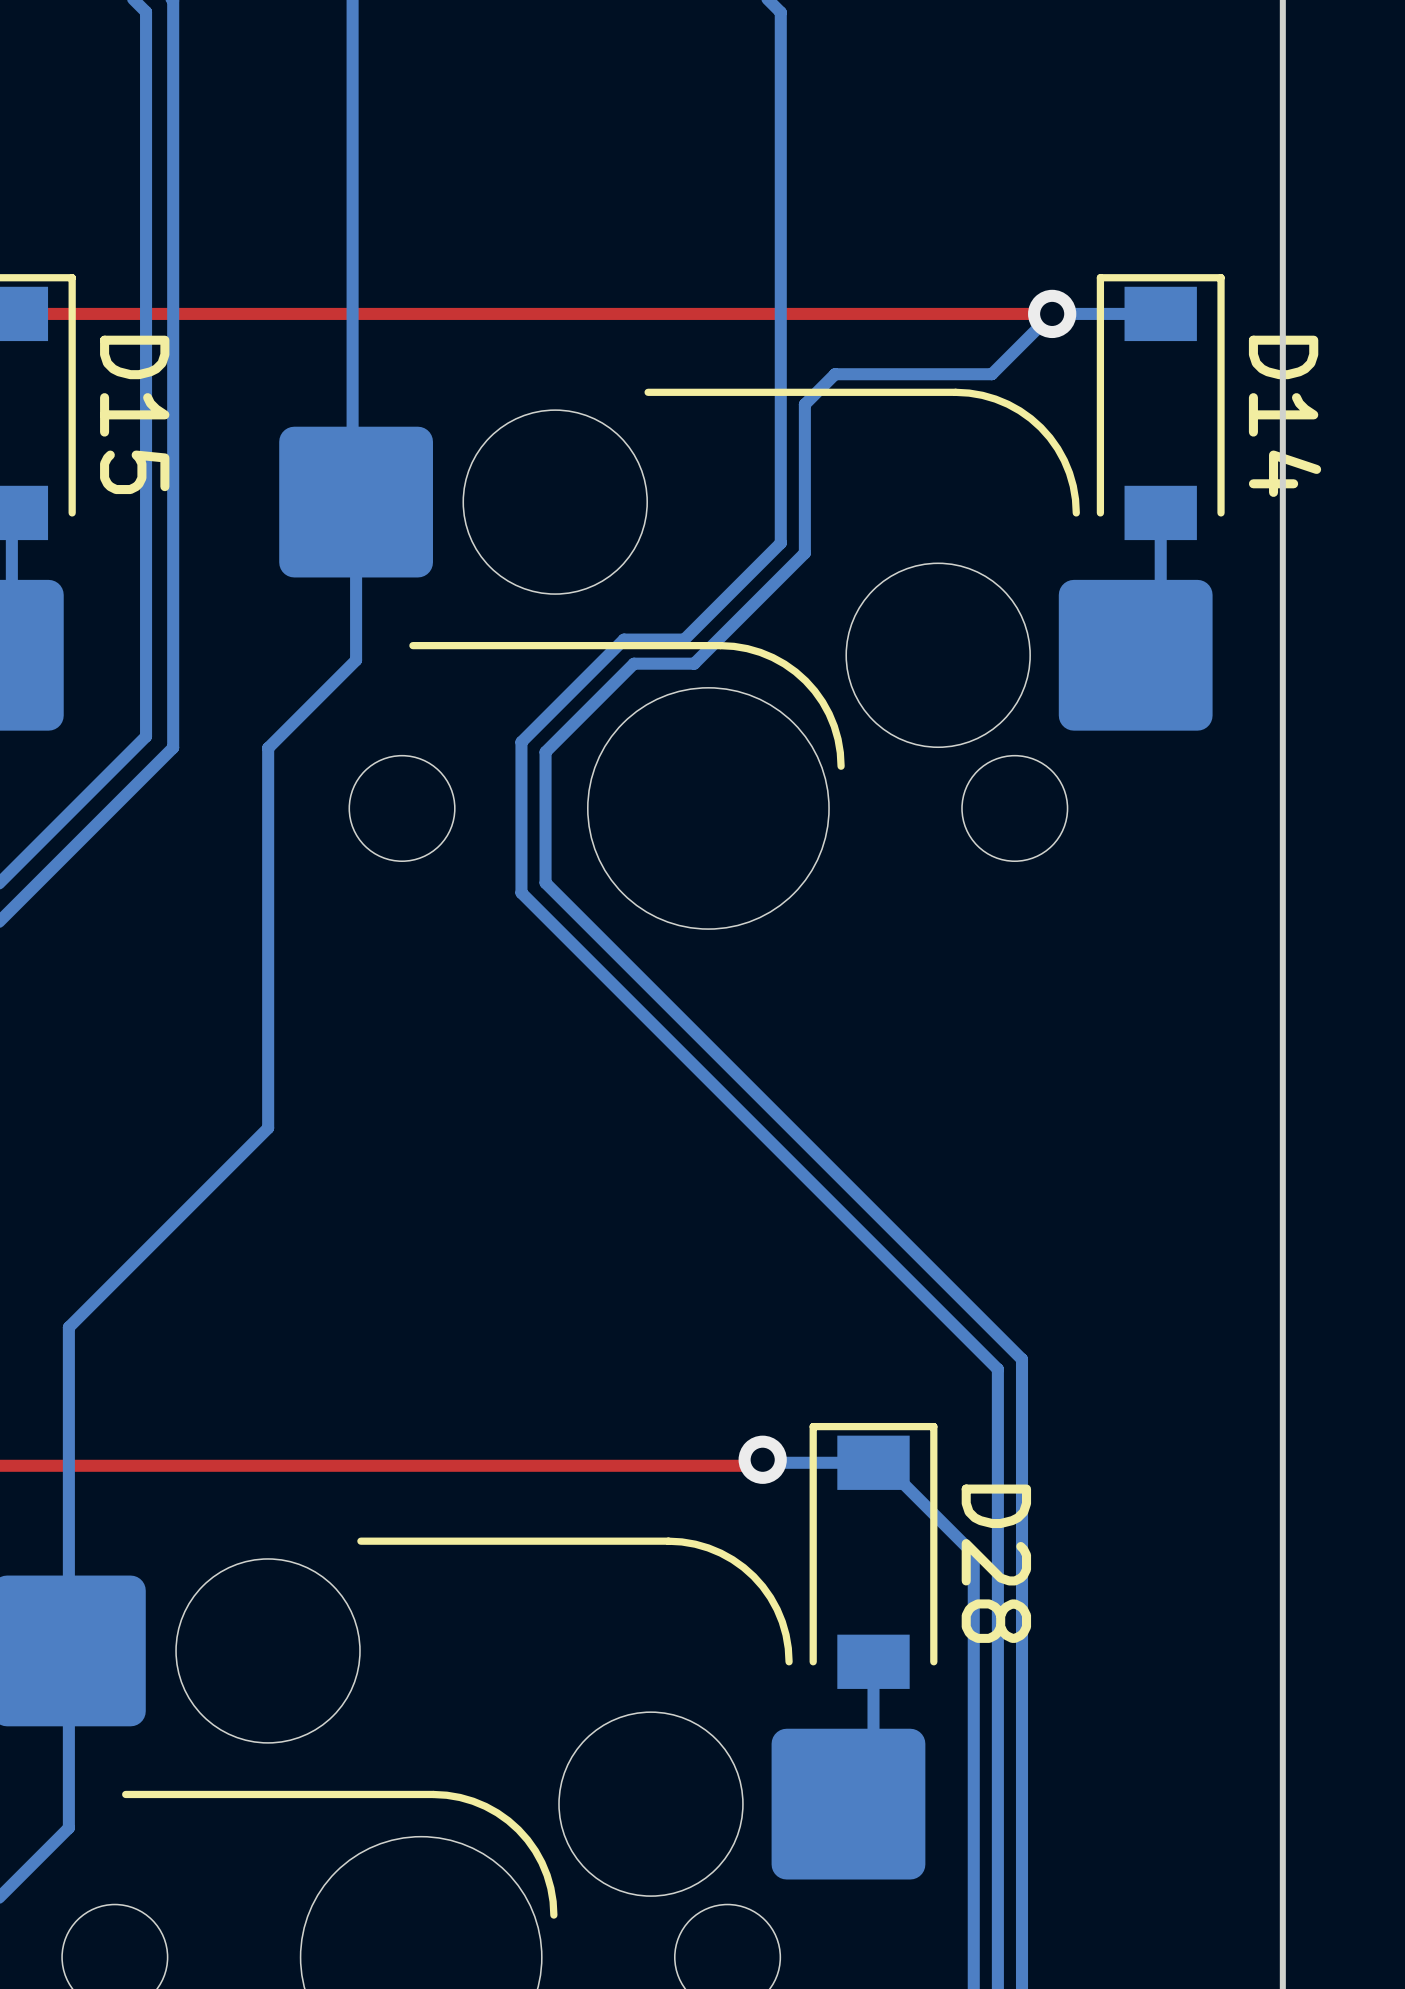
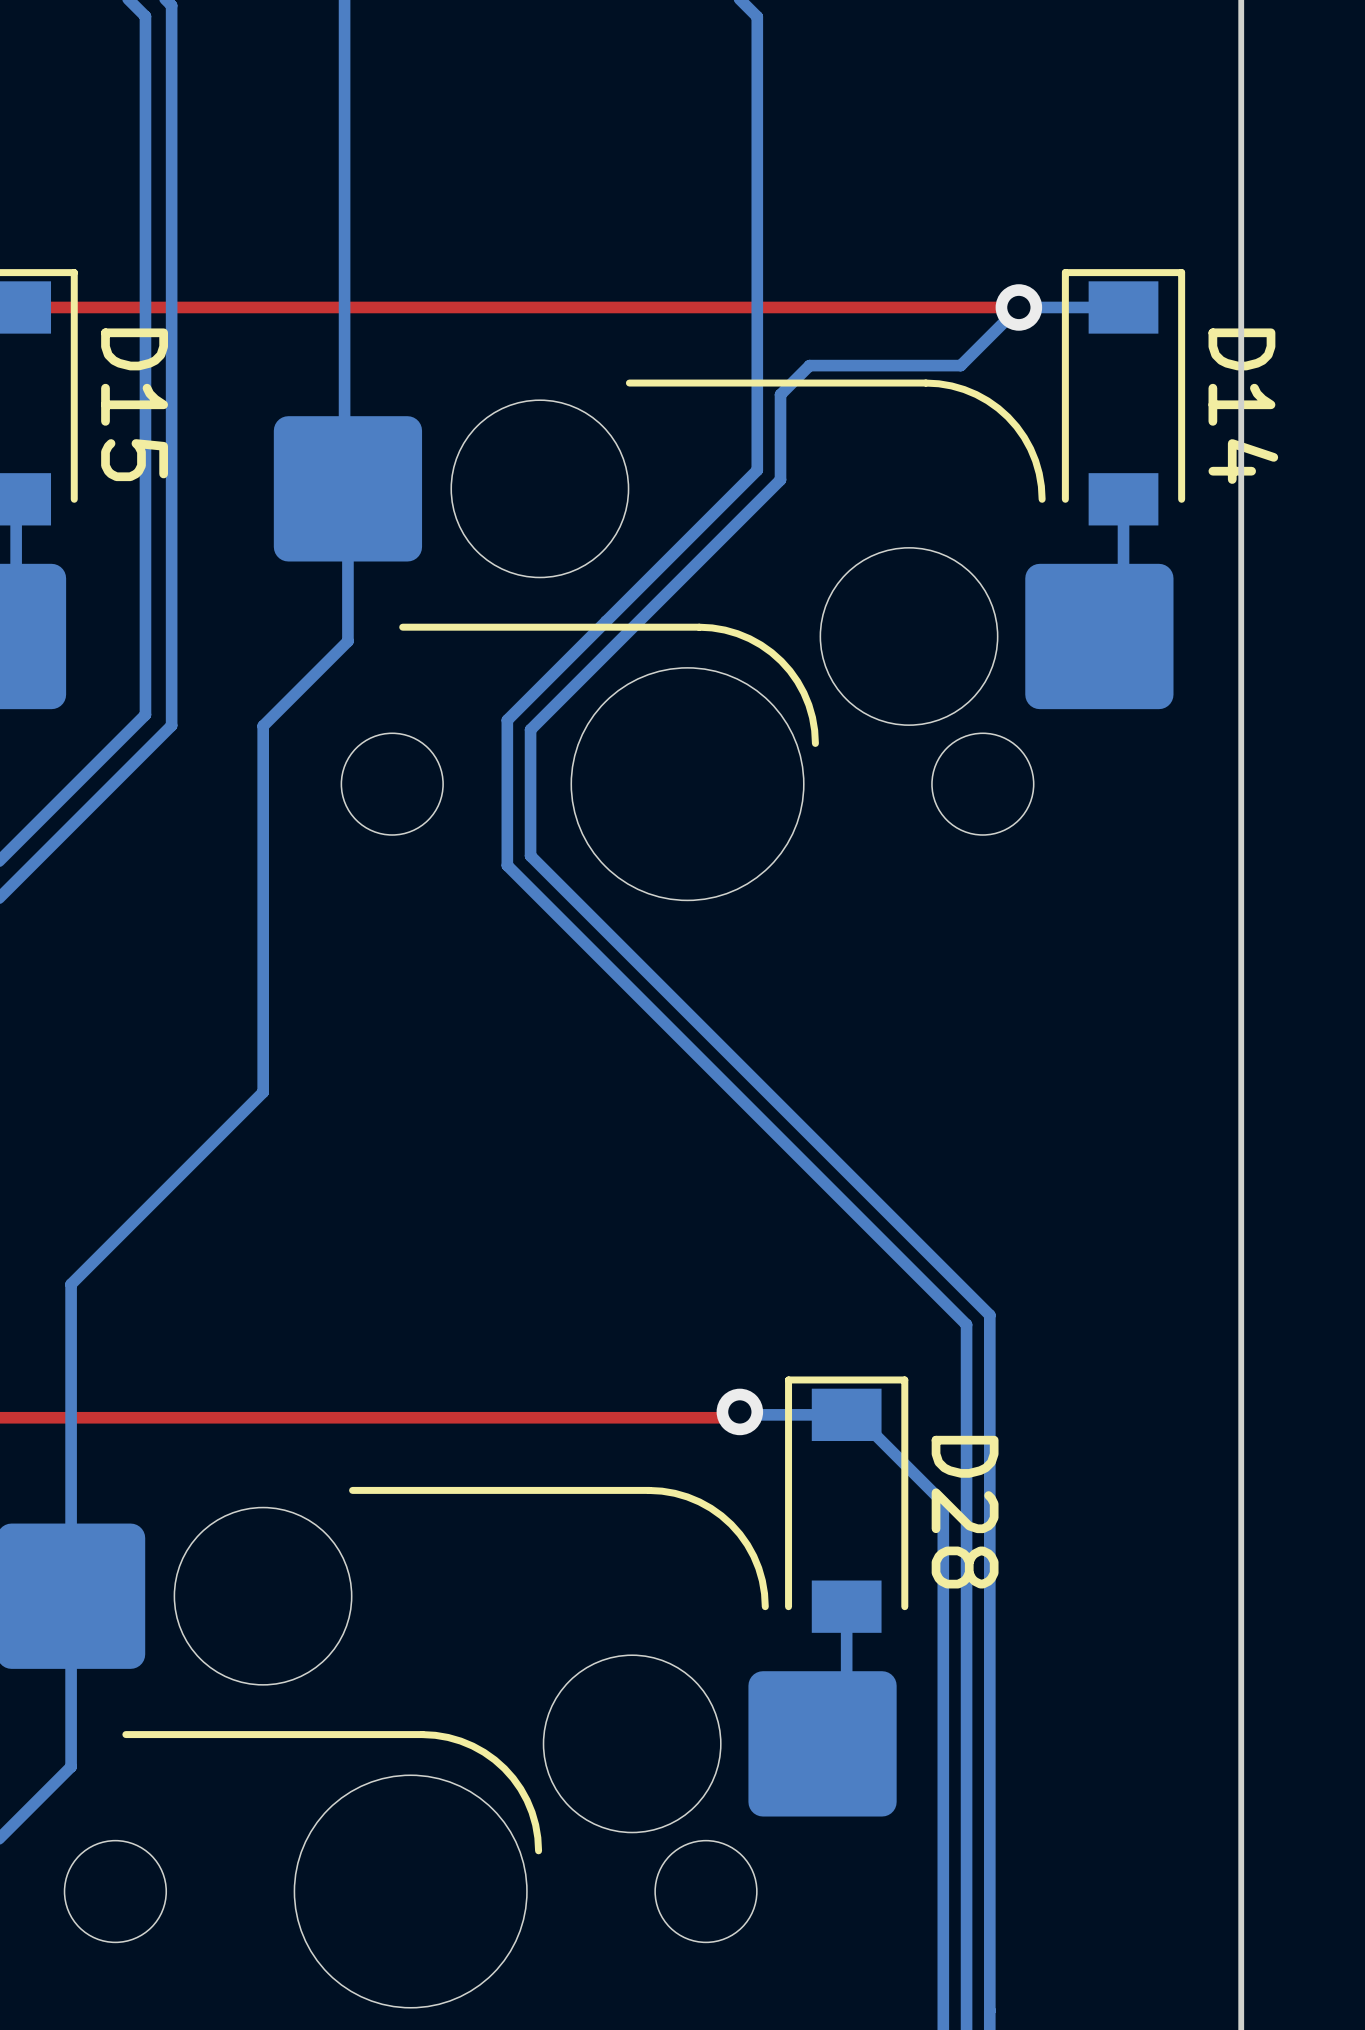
bottom track: (780, 482) (780, 543) (684, 639) (623, 639) -> (757, 470) (606, 621)
bottom track: (804, 492) (804, 553) (694, 663) (633, 663) -> (780, 479) (615, 644)

